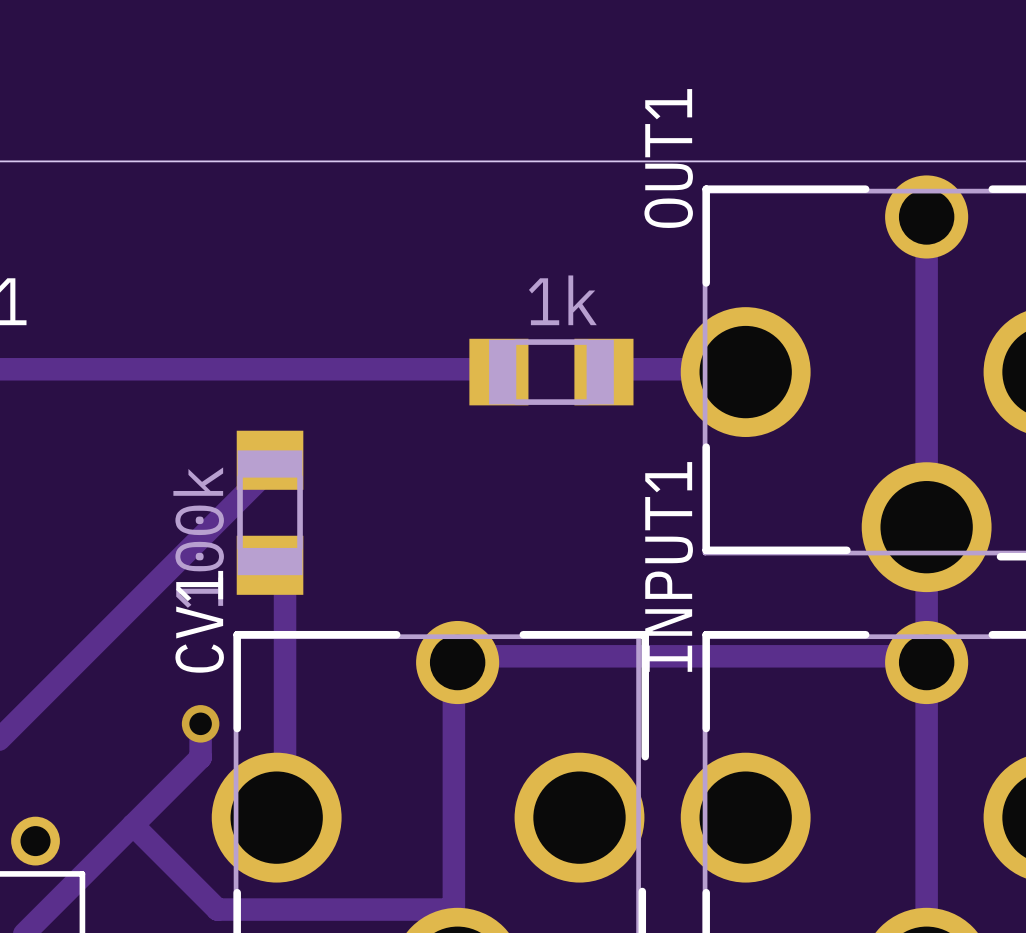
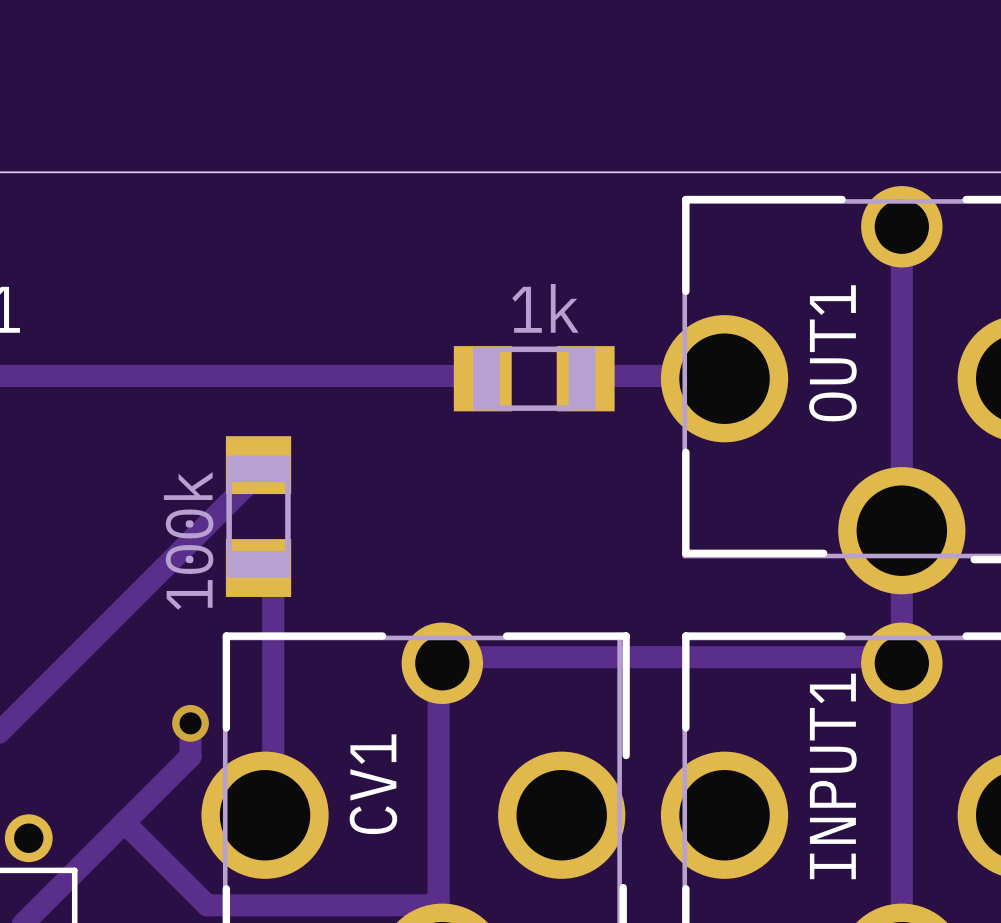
OUT1 name position: OUT1 (668, 158) -> OUT1 (832, 353)
INPUT1 name position: INPUT1 (669, 566) -> INPUT1 (833, 776)
CV1 name position: CV1 (199, 621) -> CV1 (373, 784)

